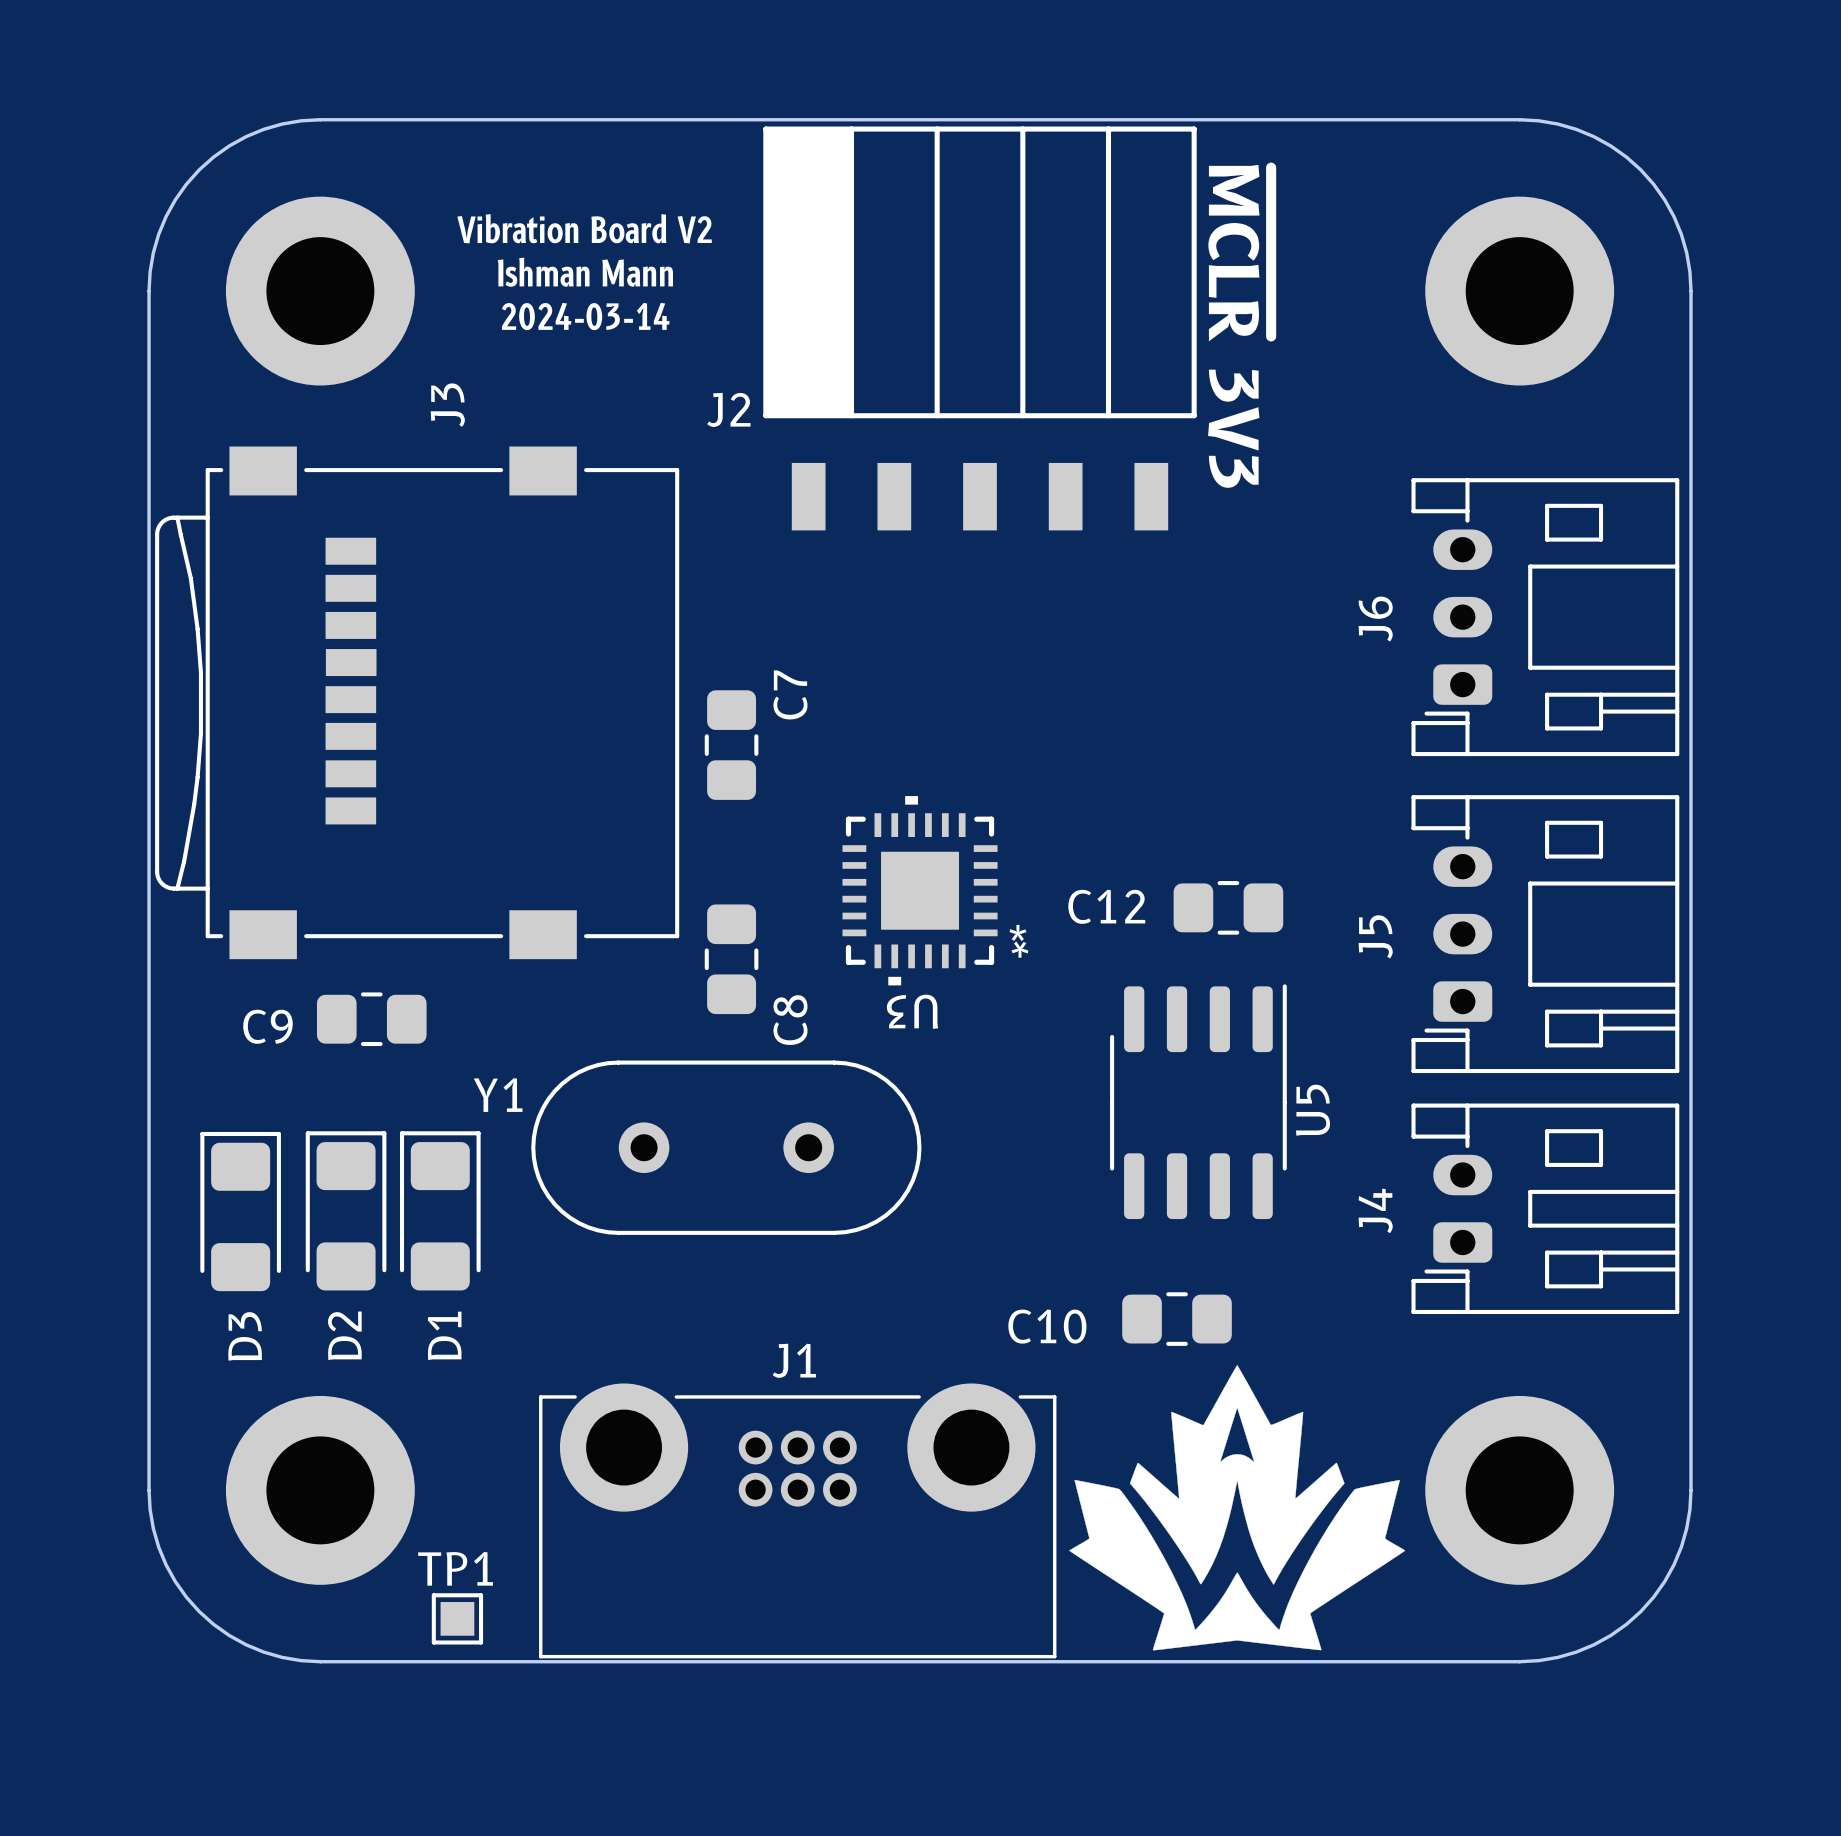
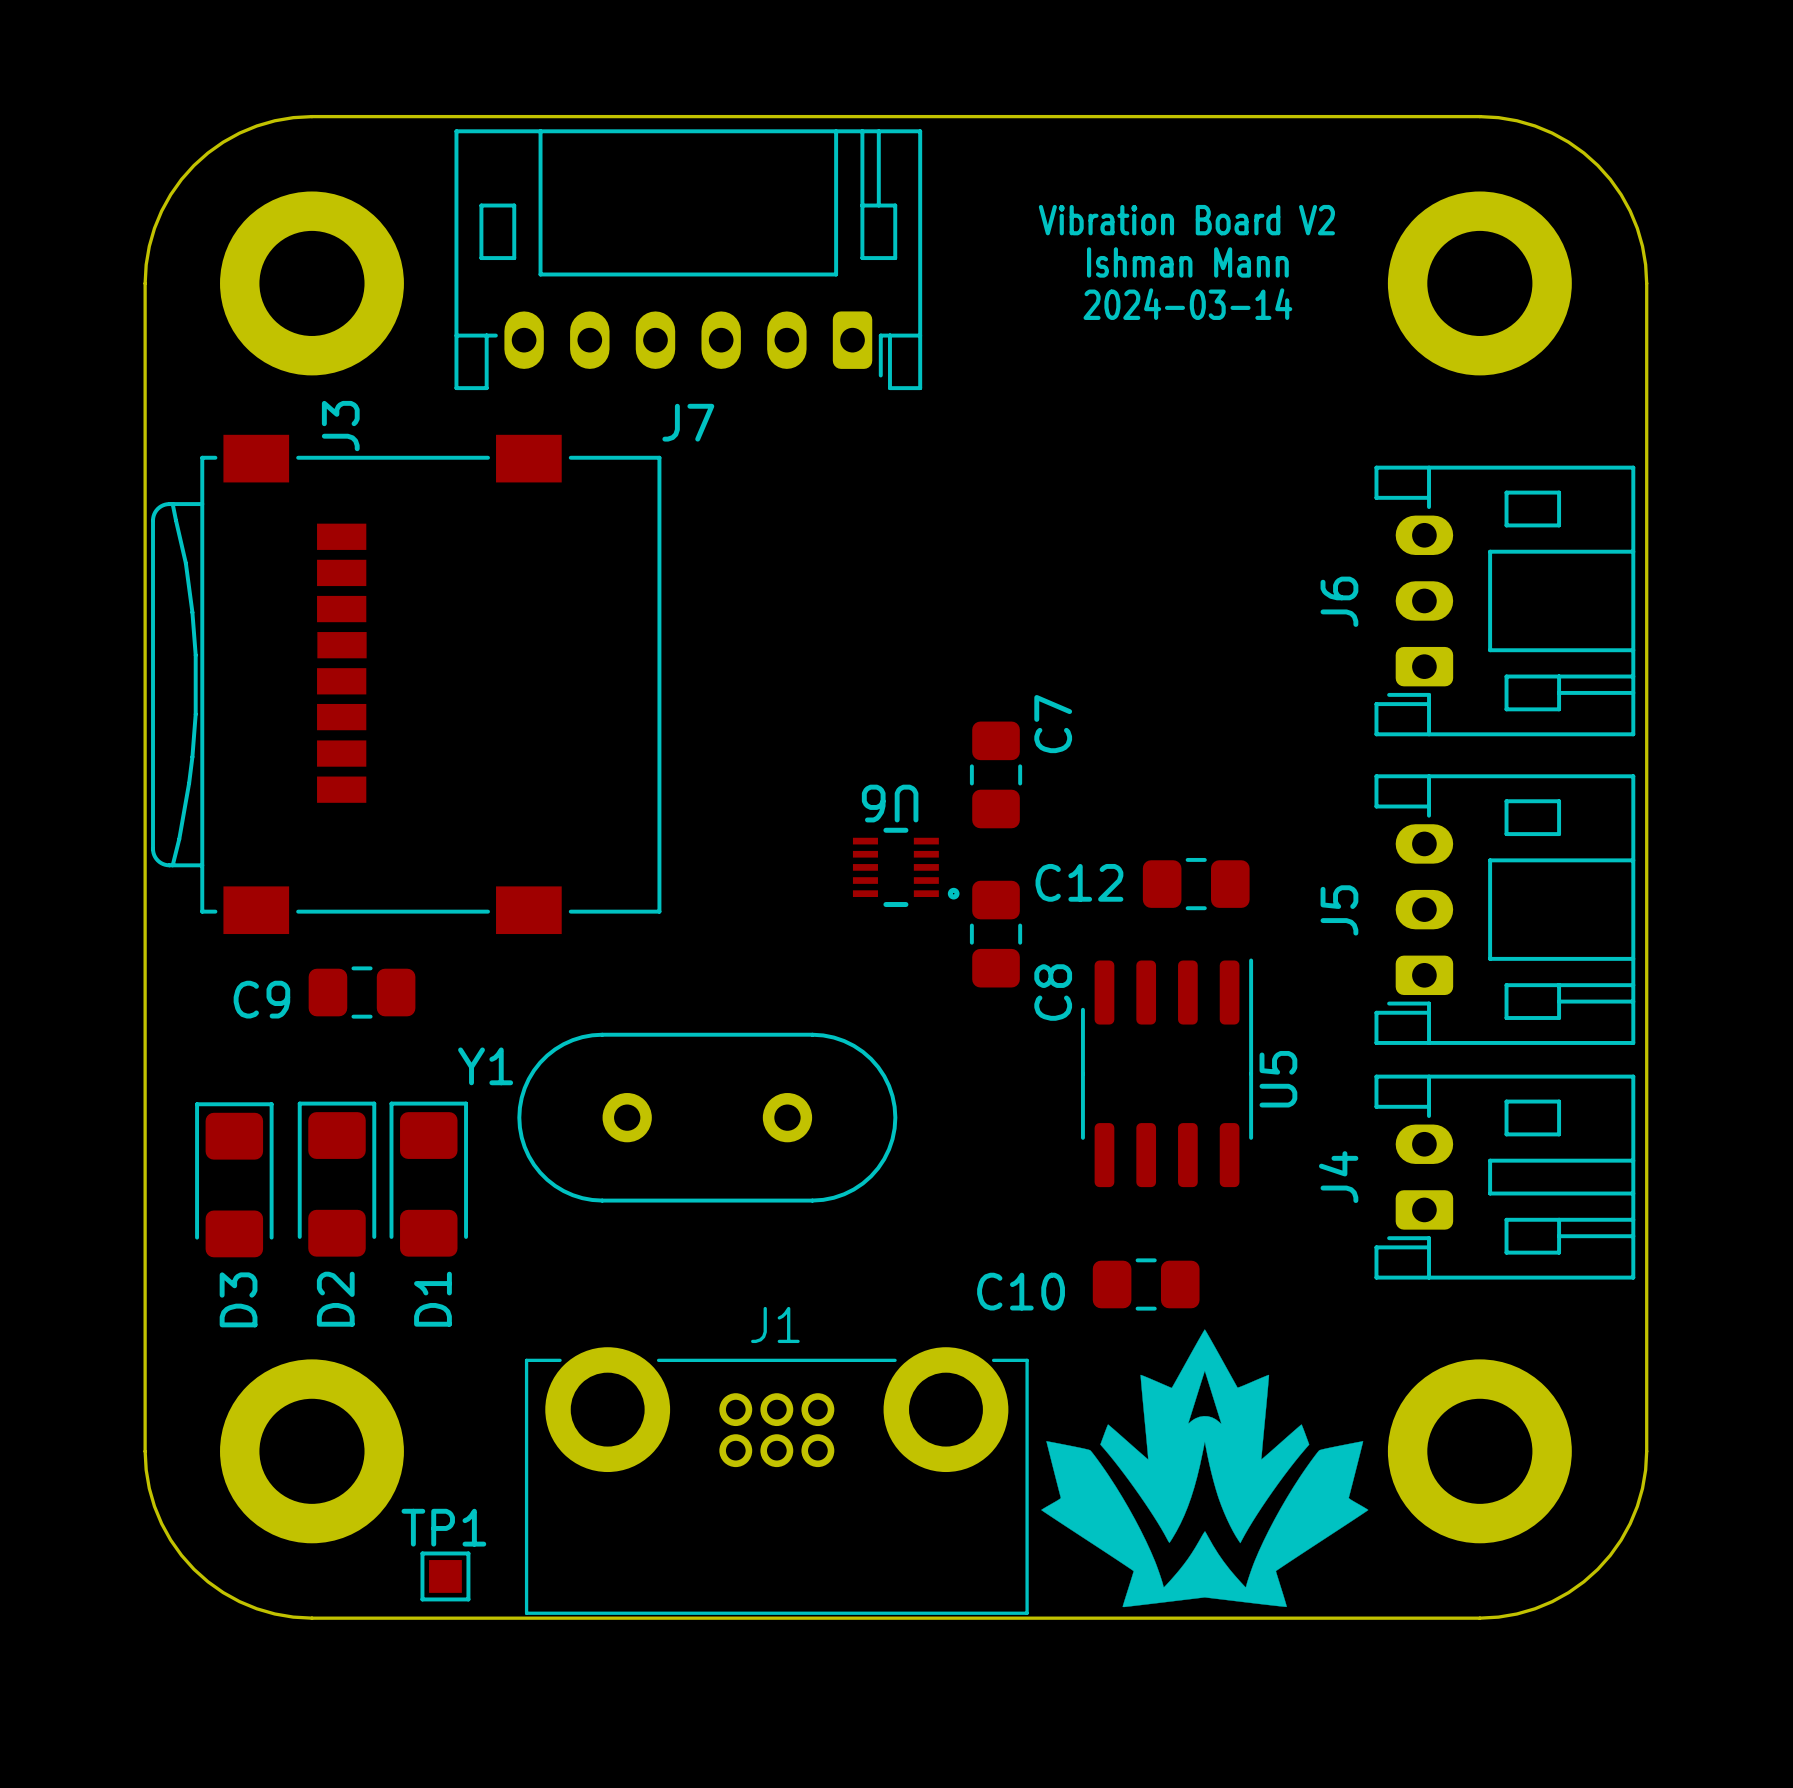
text position: Vibration Board V2 (584, 228) -> Vibration Board V2 (1186, 220)
J7: none -> (688, 259)
text position: Ishman Mann (585, 272) -> Ishman Mann (1187, 262)
text position: 2024-03-14 (585, 316) -> 2024-03-14 (1187, 304)
text: ~{MCLR} 3V3 (1239, 326) -> none
J2: (979, 328) -> none
J3 name position: J3 (447, 405) -> J3 (340, 426)
C7 position: (731, 745) -> (996, 774)
U3: (920, 890) -> none
U6: none -> (906, 867)
C8 position: (731, 959) -> (996, 934)

